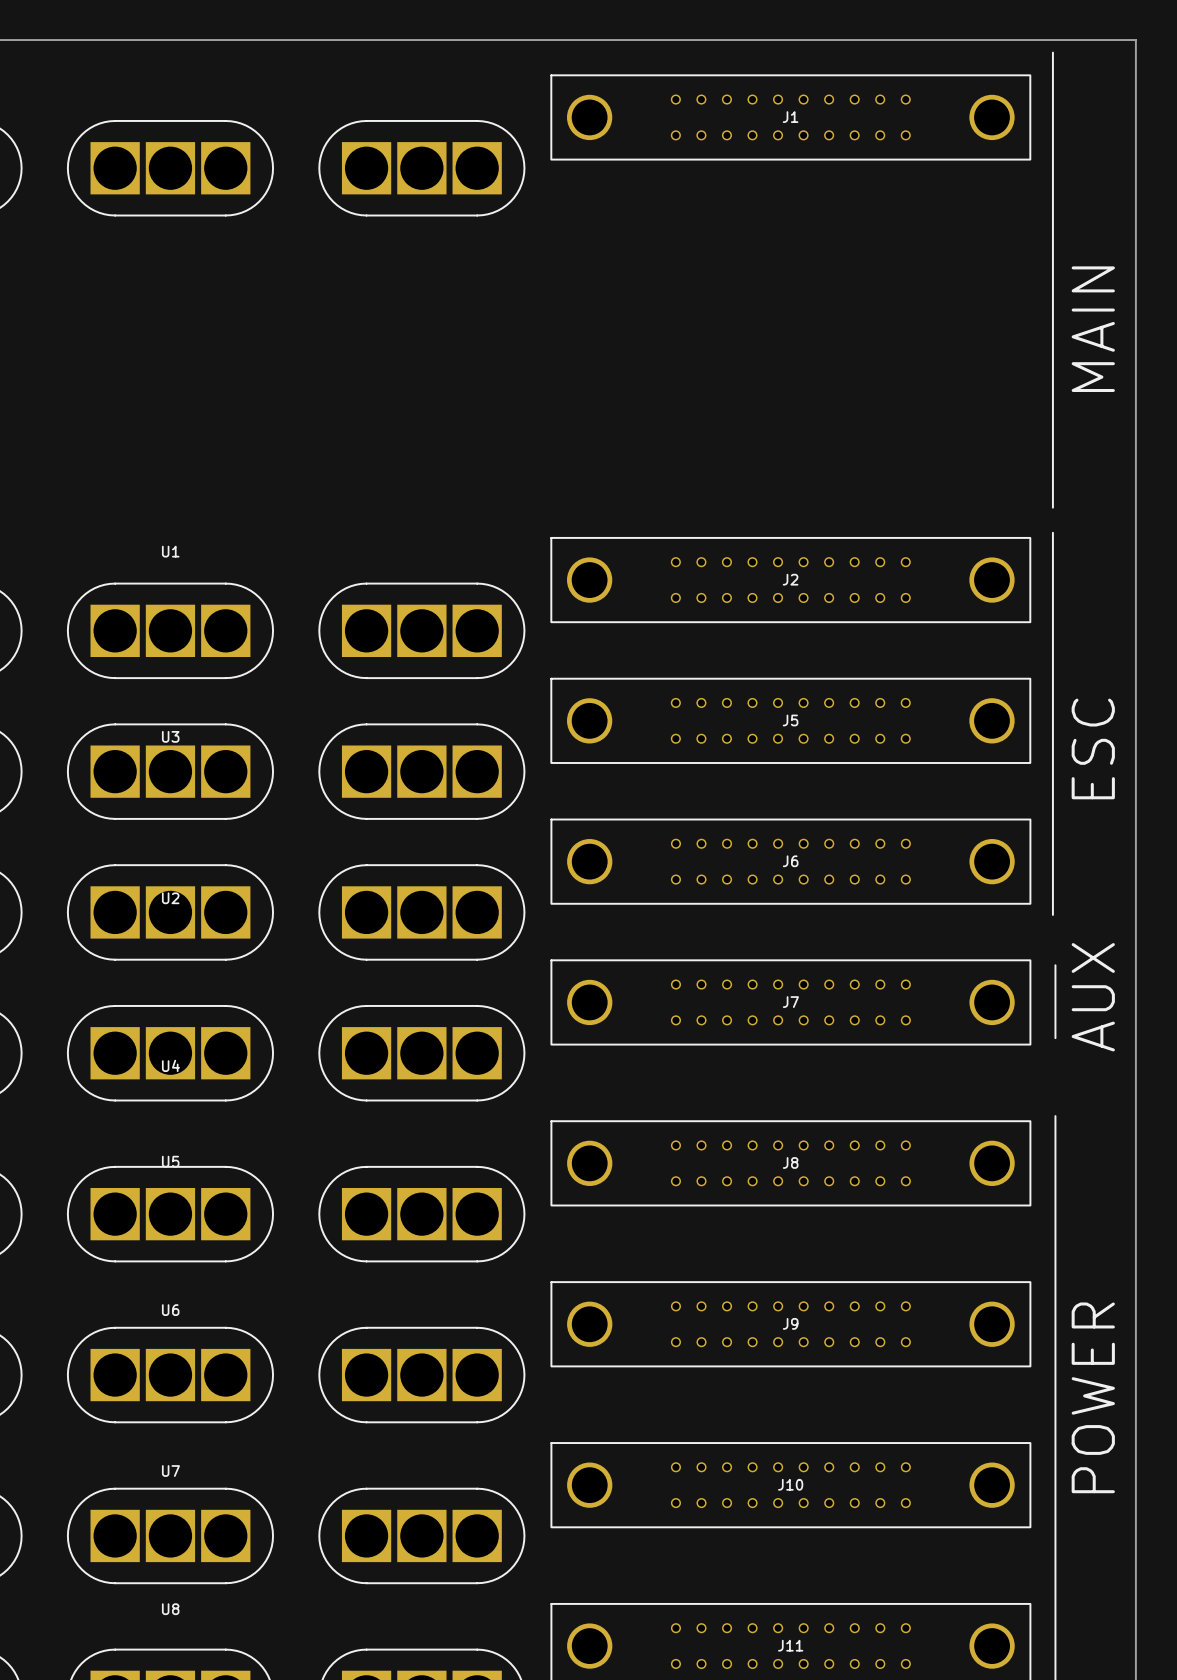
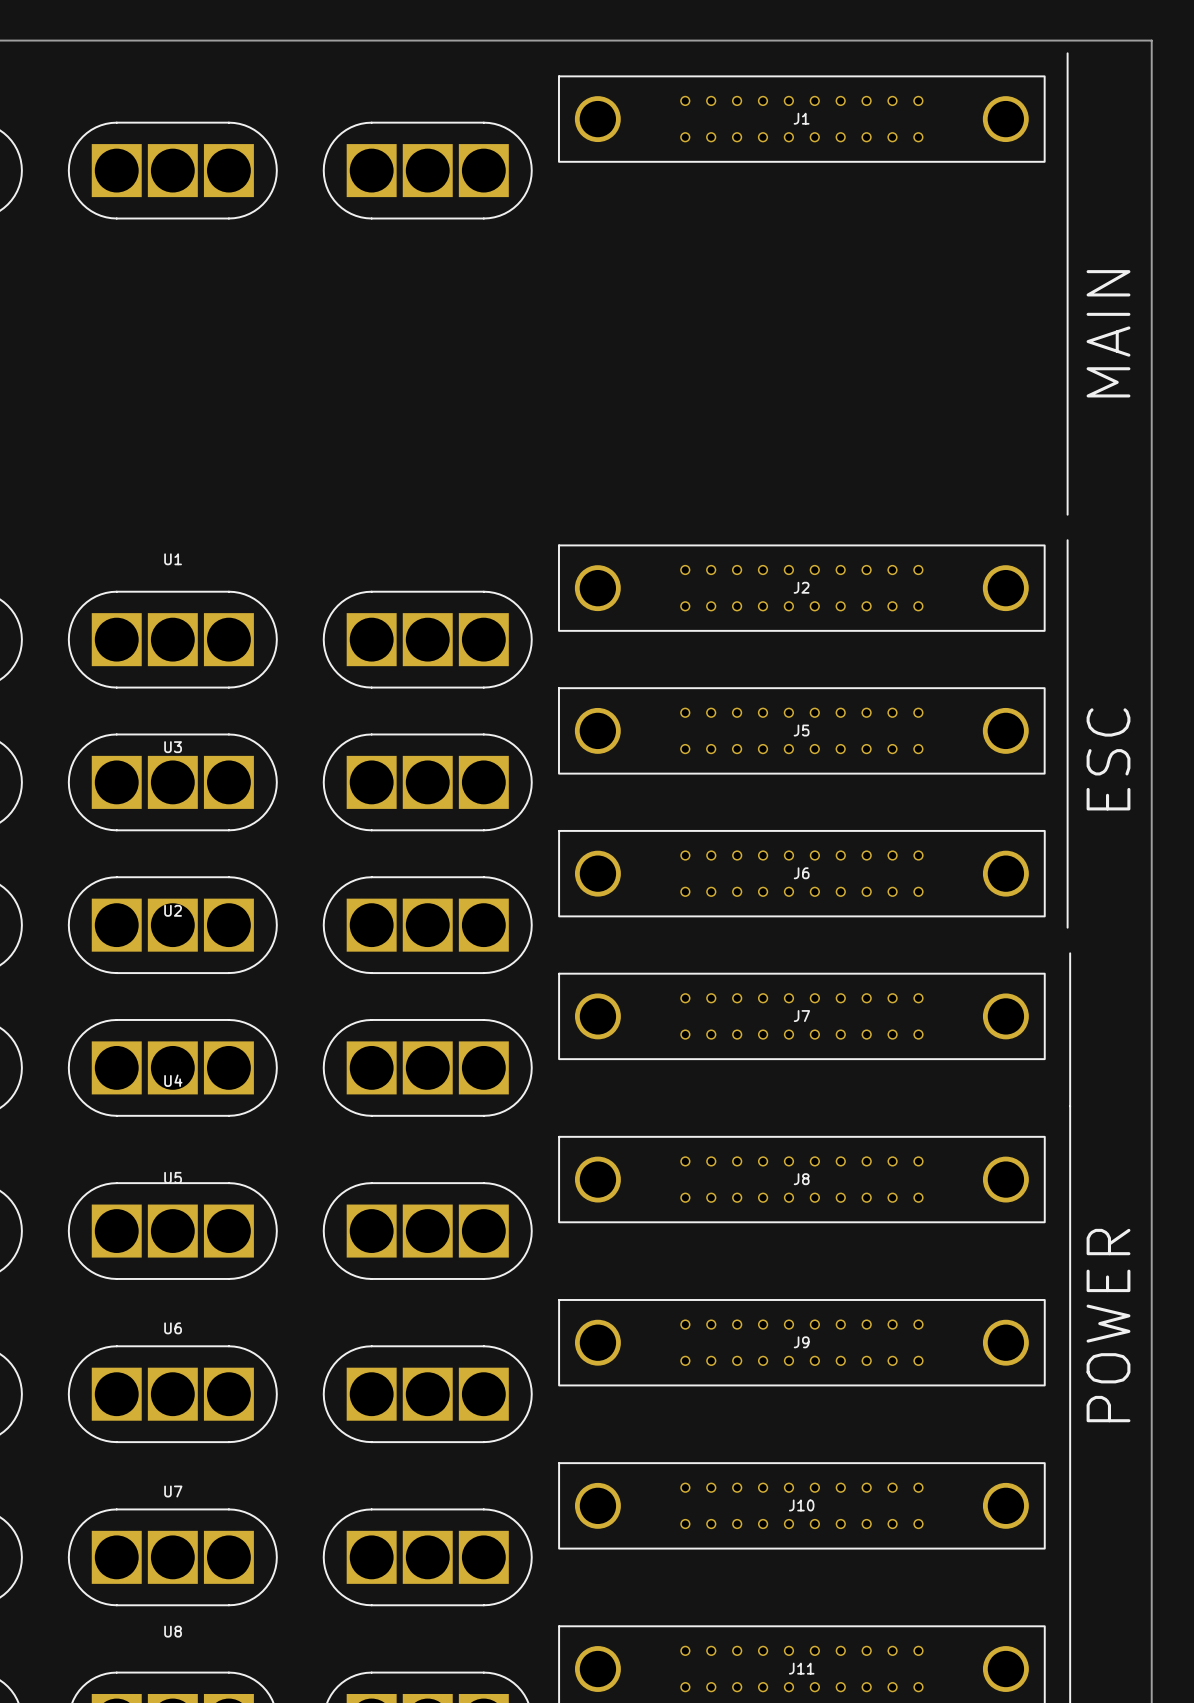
line: none -> (1070, 953) (1070, 978)
text: AUX (1093, 997) -> none
line: none -> (1070, 1052) (1070, 1131)
text position: POWER (1093, 1397) -> POWER (1108, 1325)

